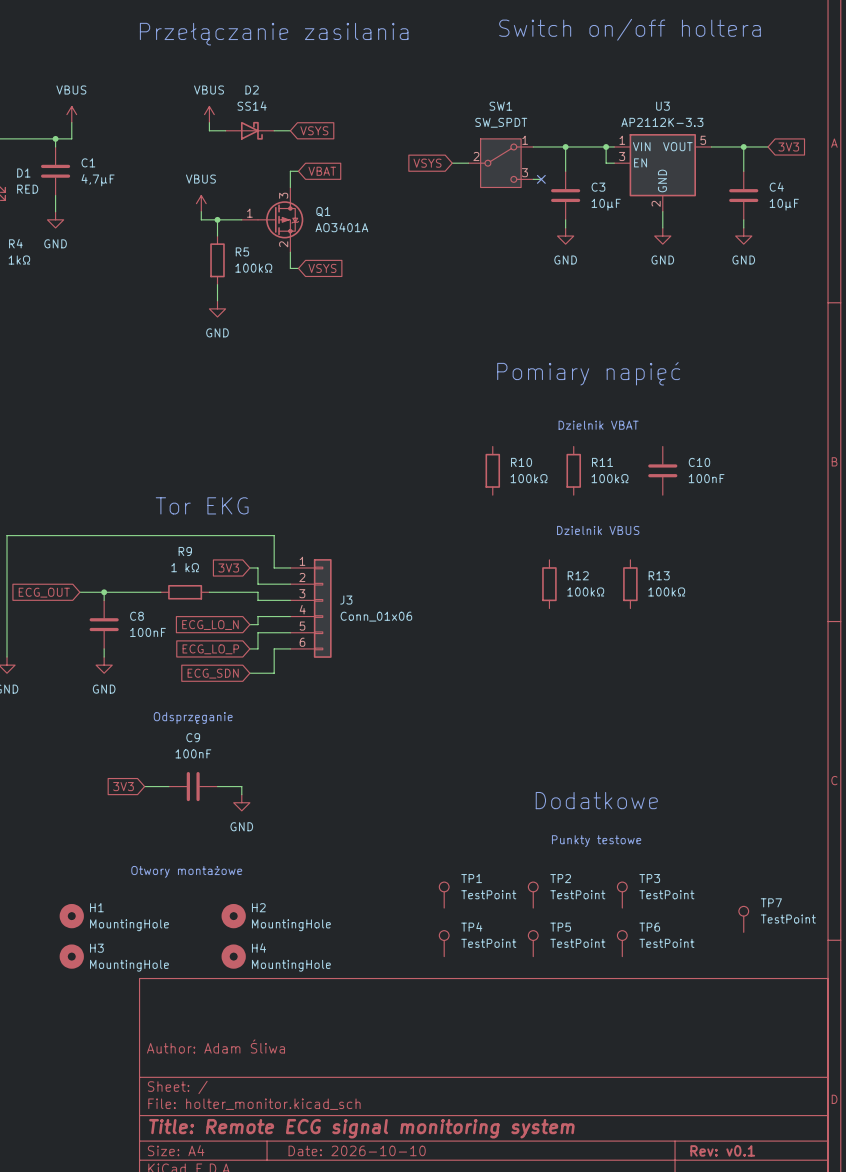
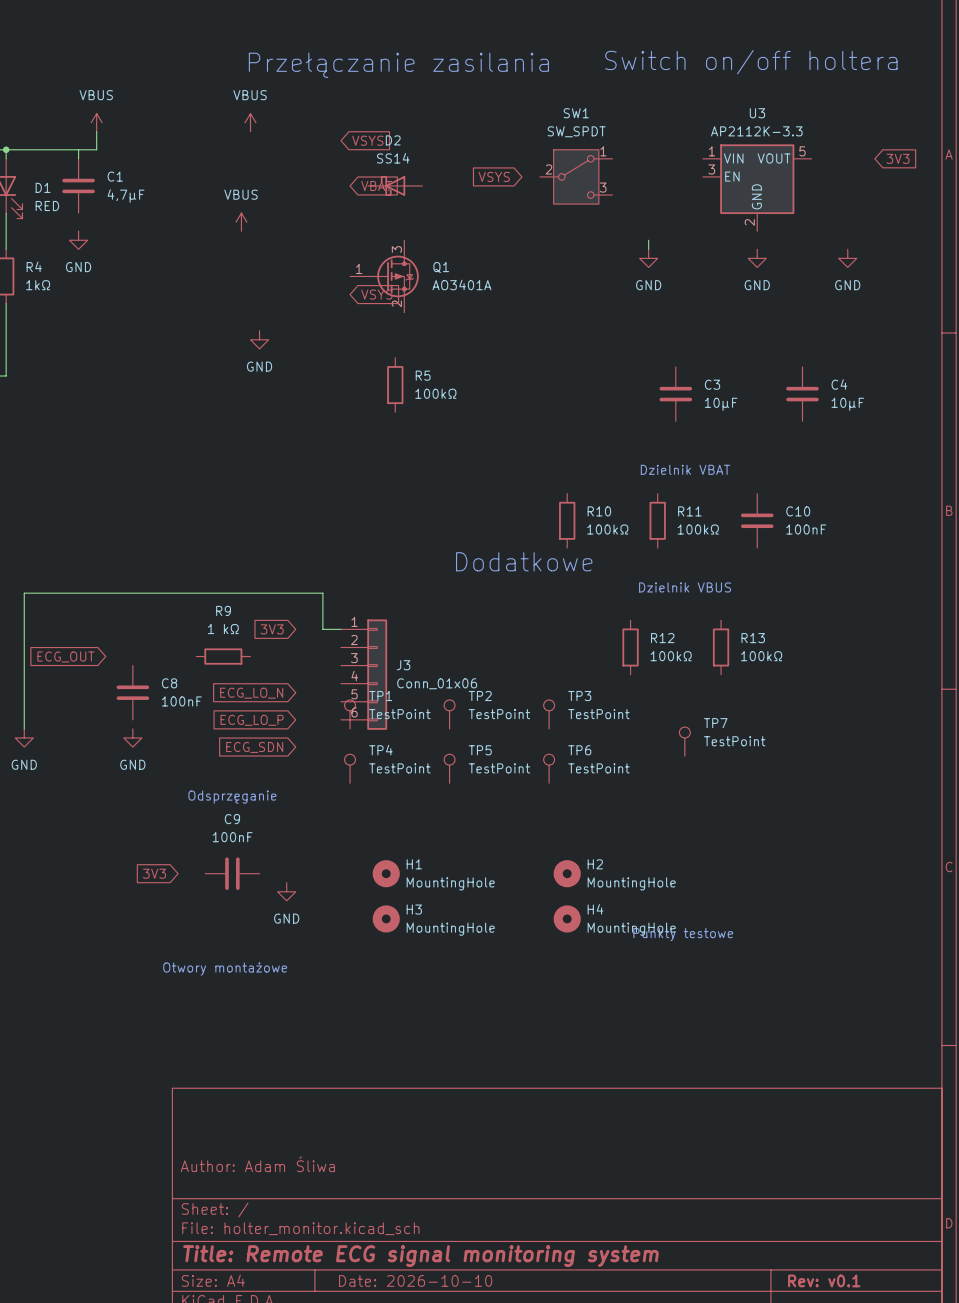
text position: Switch on/off holtera (630, 29) -> Switch on/off holtera (751, 62)
text position: Przełączanie zasilania (274, 34) -> Przełączanie zasilania (398, 65)
wire: (209, 122) (209, 130) (225, 130) -> none
D2 position: (249, 130) -> (395, 185)
D2 rotation: 0° (251, 130) -> 180° (393, 185)
wire: (274, 130) (290, 130) -> none
junction: (55, 138) -> none
wire: (533, 146) (614, 146) -> none
wire: (565, 146) (565, 171) -> none
junction: (565, 146) -> none
wire: (606, 146) (606, 163) (614, 163) -> none
junction: (606, 146) -> none
wire: (711, 146) (768, 146) -> none
wire: (743, 146) (743, 171) -> none
junction: (743, 146) -> none
wire: (452, 163) (468, 163) -> none
wire: (298, 171) (290, 171) (290, 187) -> none
wire: (533, 179) (541, 179) -> none
no-connect mark: (541, 179) -> none
wire: (55, 195) (55, 211) -> none
C3 position: (565, 195) -> (675, 394)
C4 position: (743, 195) -> (802, 394)
wire: (201, 211) (201, 219) (241, 219) -> none
wire: (662, 211) (662, 227) -> none
wire: (217, 219) (217, 236) -> none
junction: (217, 219) -> none
Q1 position: (272, 219) -> (384, 276)
wire: (743, 219) (743, 227) -> none
wire: (290, 252) (290, 268) (298, 268) -> none
R5 position: (217, 260) -> (395, 385)
wire: (217, 284) (217, 300) -> none
text: Pomiary napięć (588, 373) -> none
text: Tor EKG (202, 505) -> none
text: none -> Dodatkowe (524, 561)
wire: (249, 567) (257, 567) (257, 584) (290, 584) -> none
wire: (79, 592) (160, 592) -> none
wire: (104, 592) (104, 600) -> none
junction: (104, 592) -> none
wire: (209, 592) (257, 592) (257, 600) (290, 600) -> none
wire: (290, 616) (257, 616) (257, 624) (249, 624) -> none
wire: (290, 632) (257, 632) (257, 648) (249, 648) -> none
wire: (104, 648) (104, 657) -> none
wire: (290, 648) (274, 648) (274, 673) (249, 673) -> none
wire: (144, 786) (168, 786) -> none
wire: (217, 786) (241, 786) (241, 794) -> none
text: Dodatkowe (596, 800) -> none
TP1 position: (444, 895) -> (350, 714)
TP2 position: (533, 895) -> (449, 714)
TP3 position: (622, 895) -> (549, 714)
H1 position: (71, 916) -> (386, 873)
H2 position: (233, 916) -> (567, 873)
TP7 position: (743, 919) -> (684, 741)
TP4 position: (444, 943) -> (350, 768)
TP5 position: (533, 943) -> (449, 768)
TP6 position: (622, 943) -> (549, 768)
H3 position: (71, 956) -> (386, 918)
H4 position: (233, 956) -> (567, 918)

